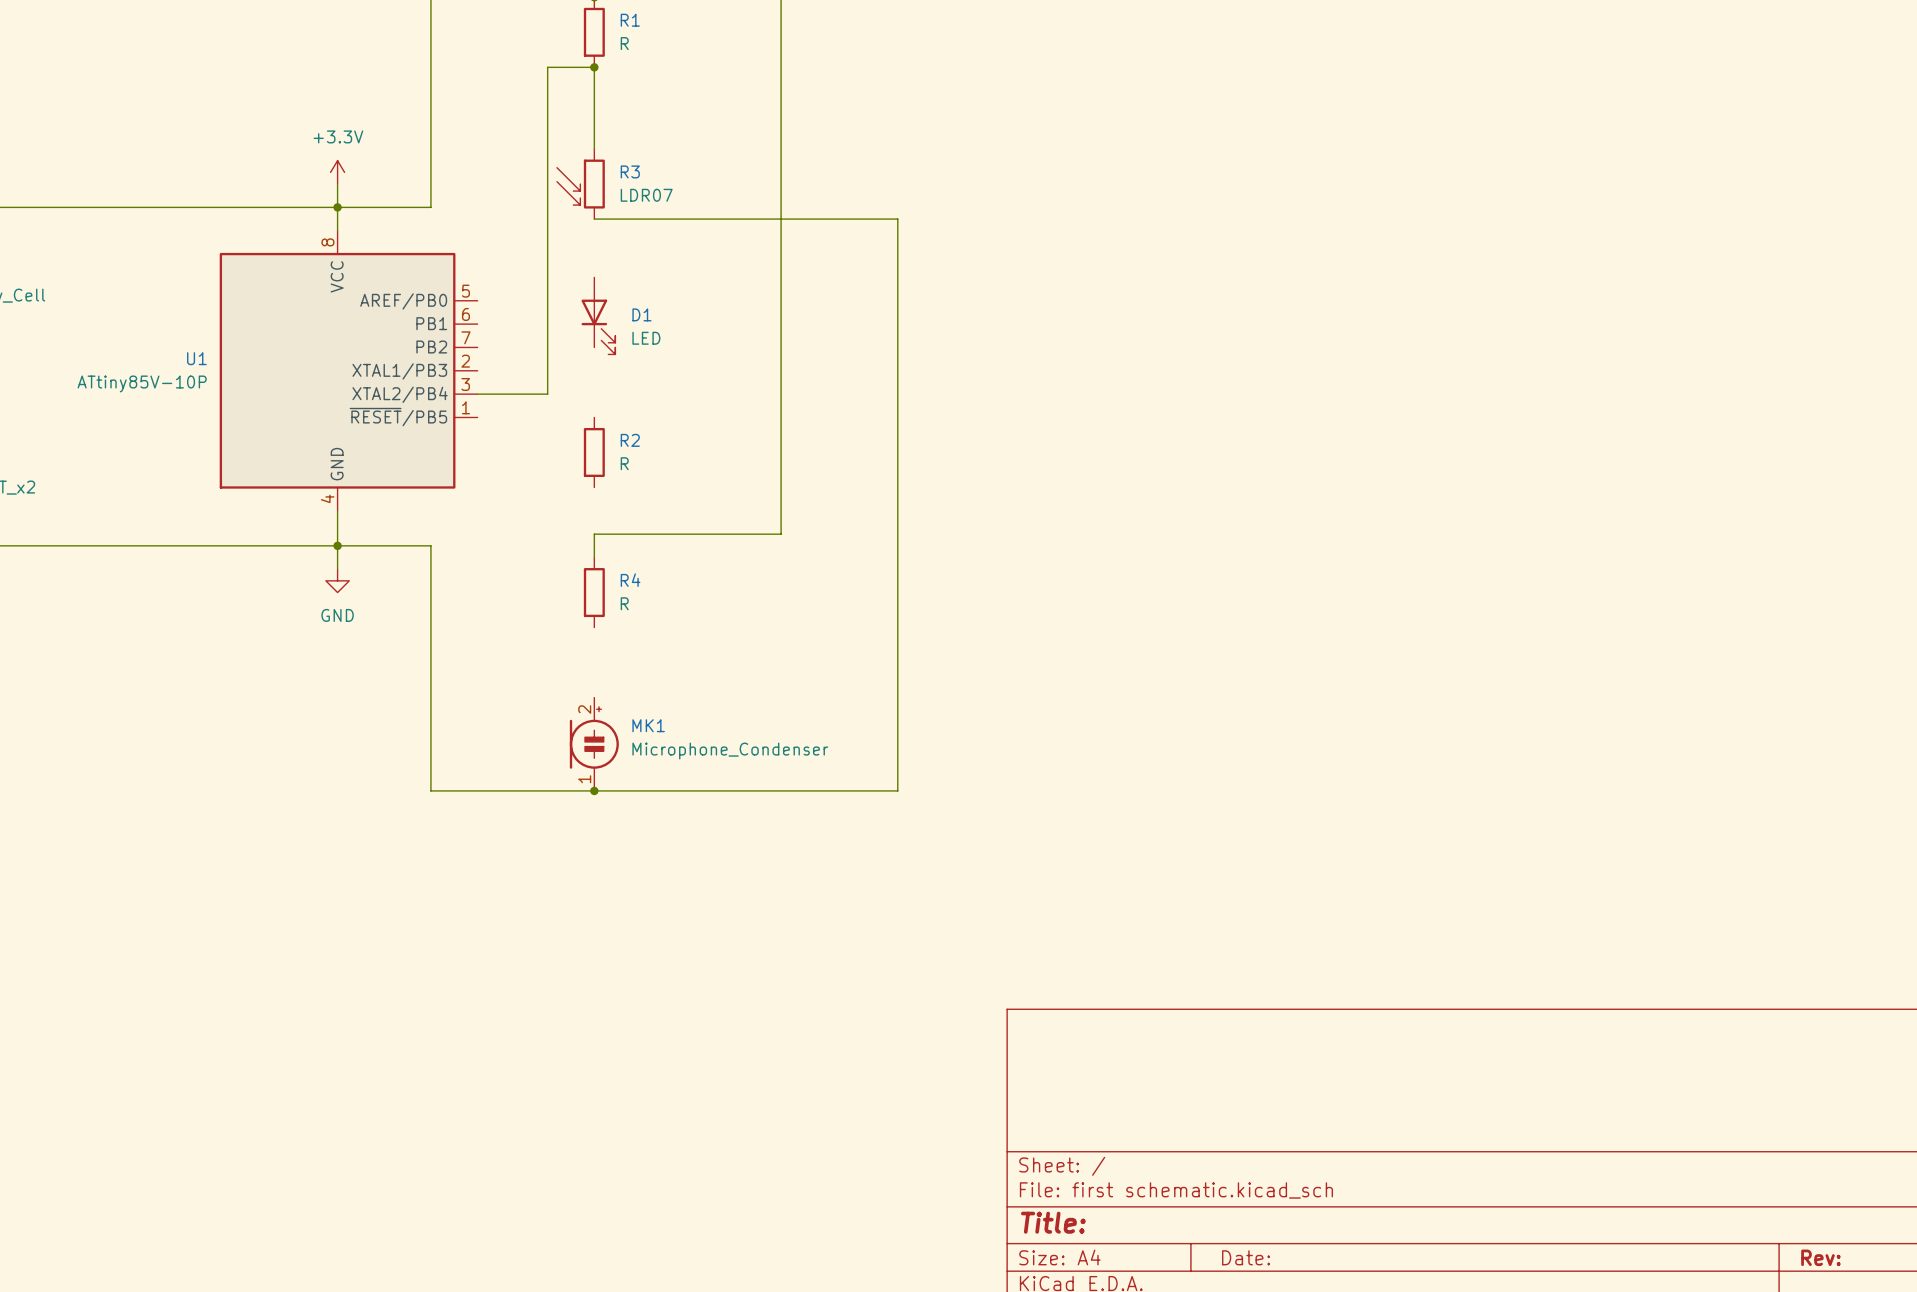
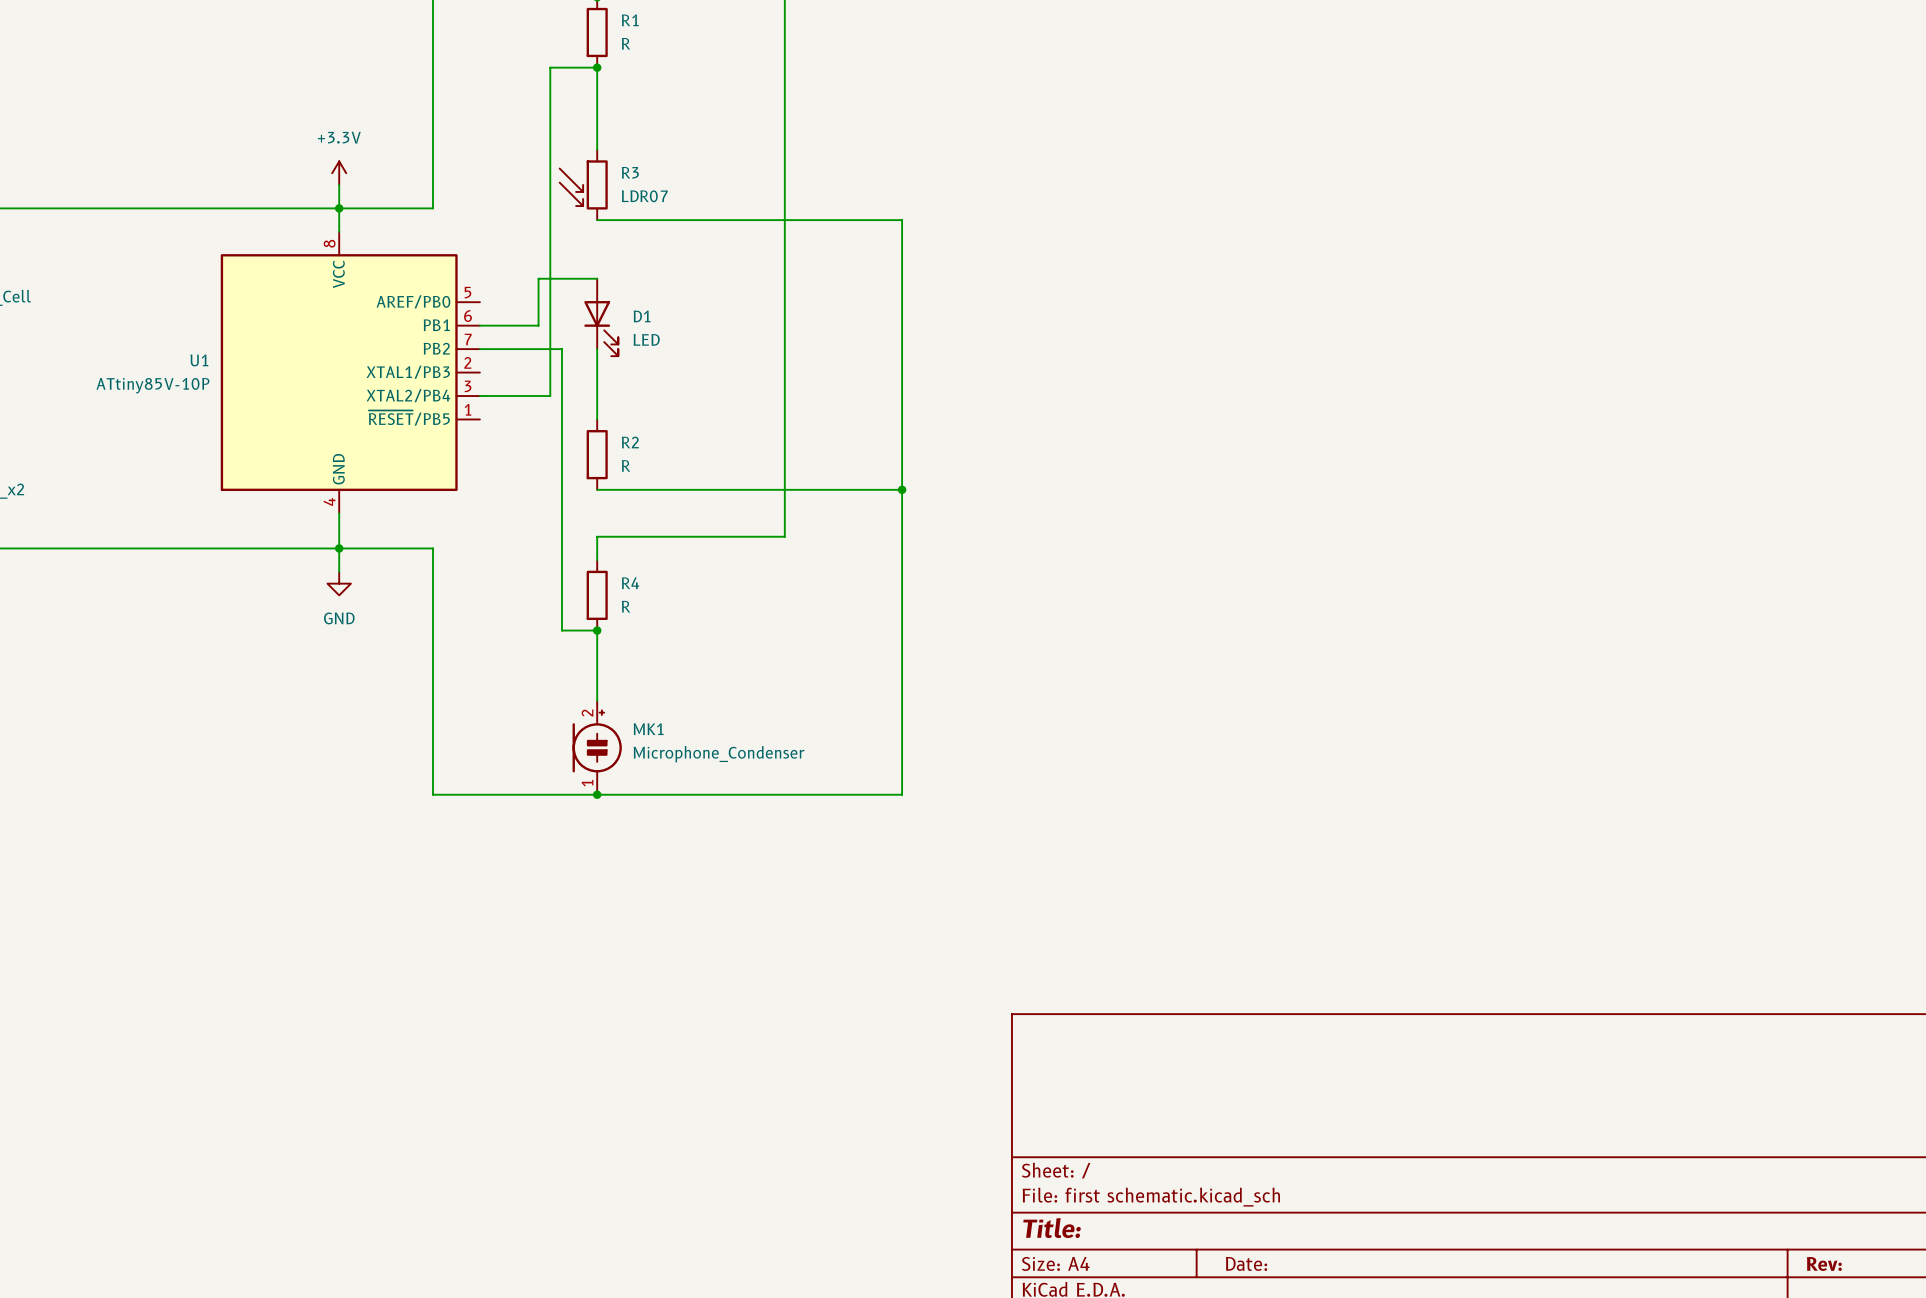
wire: none -> (597, 278) (538, 278) (538, 325) (479, 325)
wire: none -> (479, 349) (562, 349) (562, 630) (597, 630) (597, 700)
wire: none -> (597, 349) (597, 419)
wire: none -> (597, 489) (902, 489)
junction: none -> (902, 489)
junction: none -> (597, 630)

